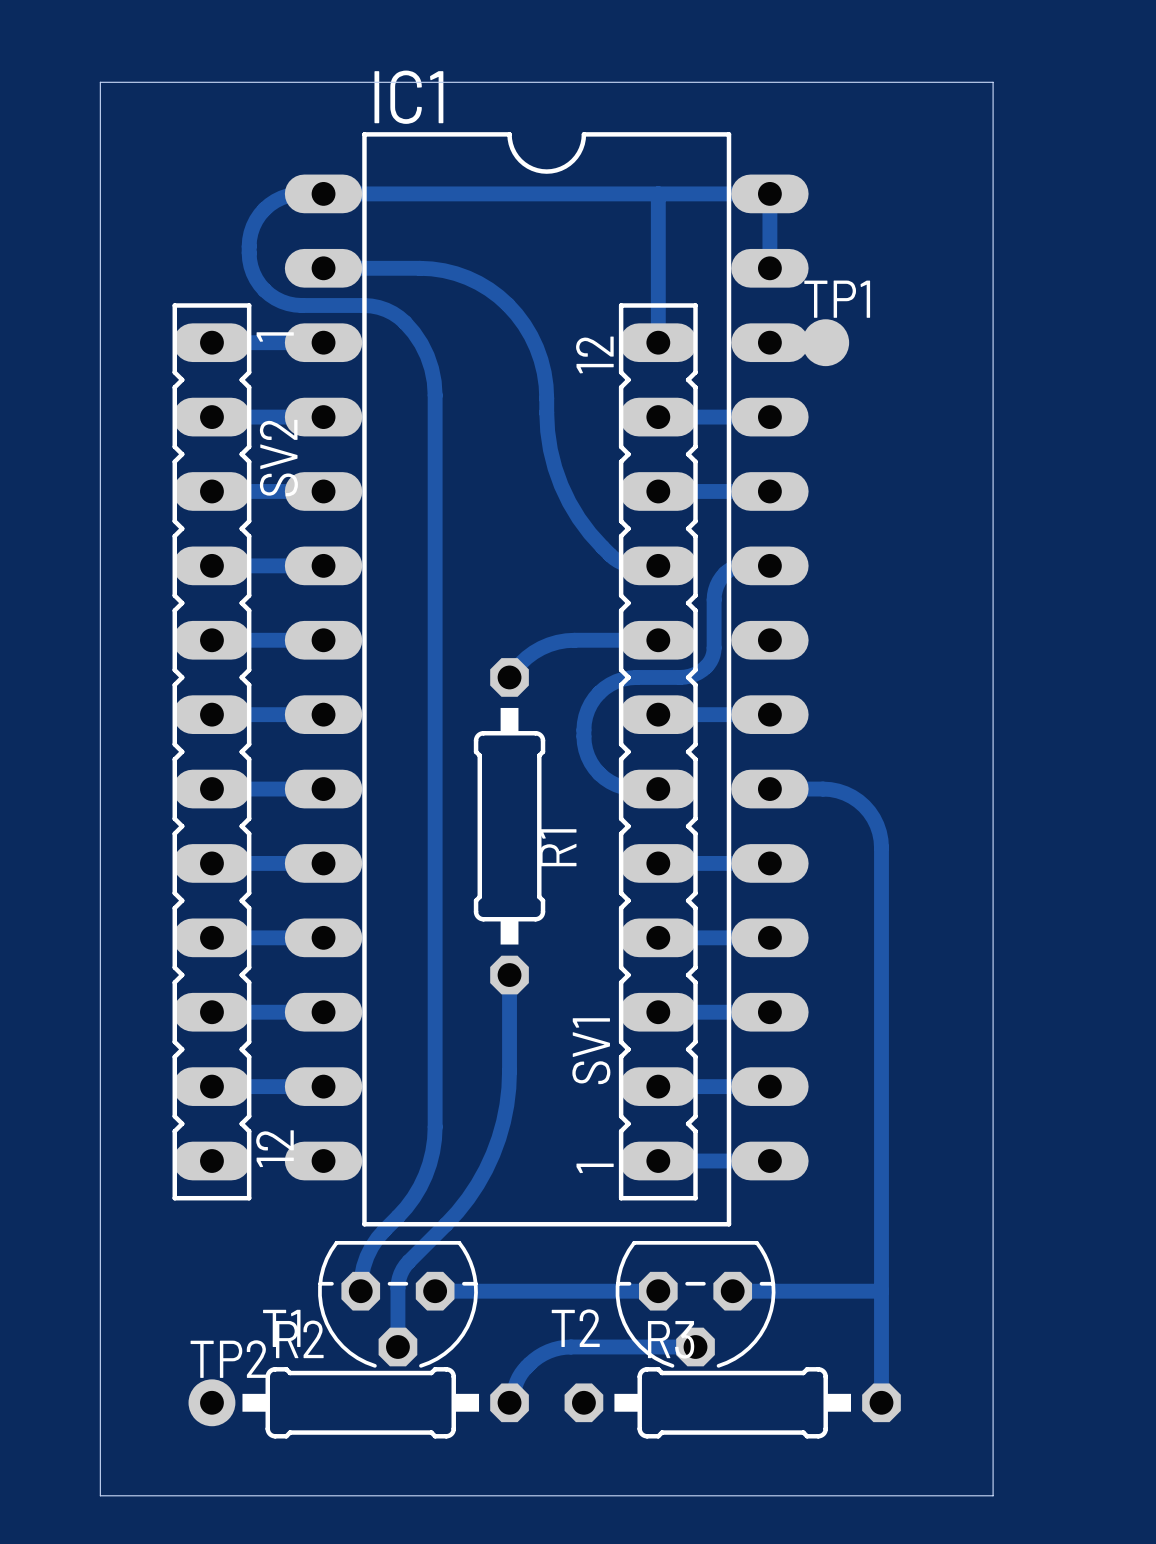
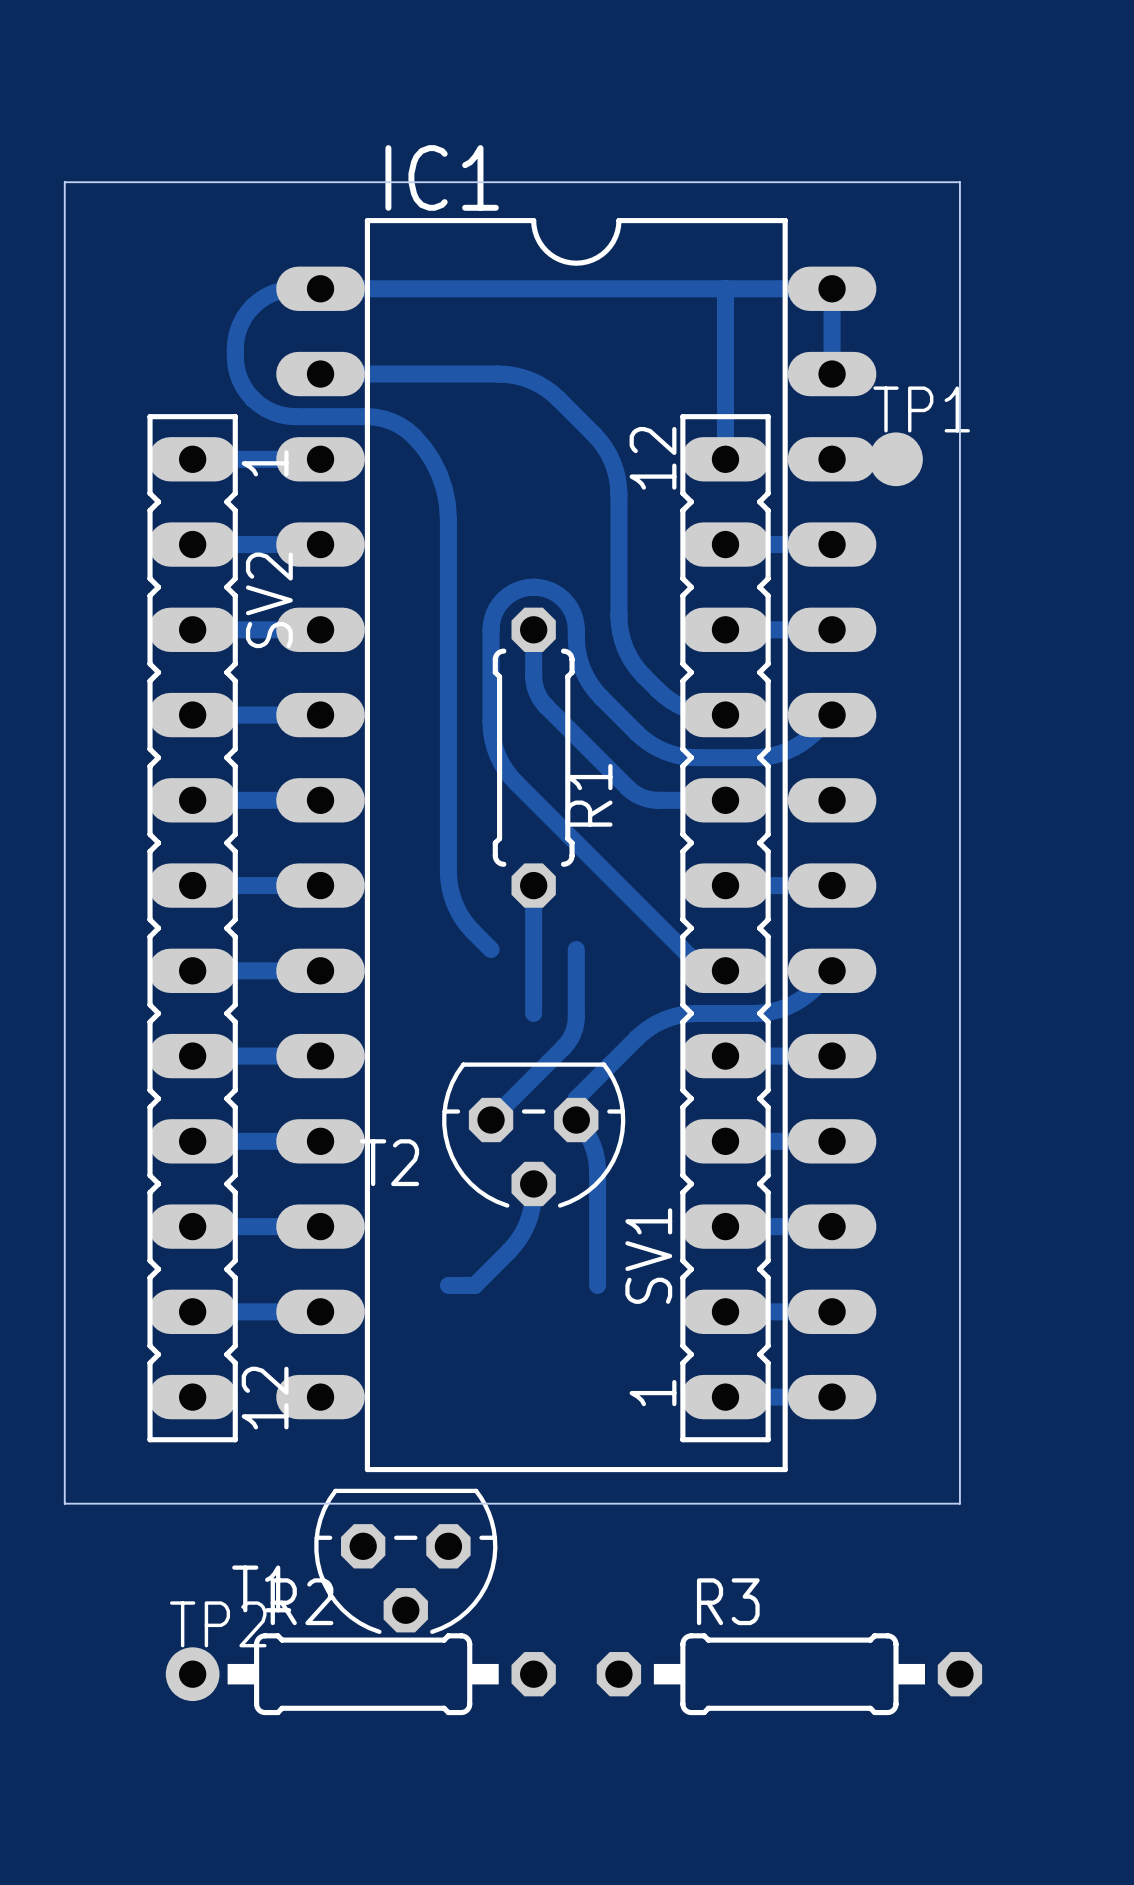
board edge: (100, 100) (100, 82) (993, 82) (993, 1495) (100, 1495) (100, 1254) -> (64, 182) (959, 182) (959, 1503) (64, 1503)
track: (658, 193) (658, 342) -> (725, 288) (725, 459)
track: (419, 268) (455, 273) (478, 283) (498, 296) (516, 314) (531, 336) (541, 360) (546, 385) (547, 431) (550, 449) (561, 485) (569, 502) (589, 533) (613, 558) (631, 565) (658, 565) -> (430, 374) (506, 374) (530, 380) (552, 393) (599, 440) (612, 461) (618, 486) (618, 615) (620, 632) (625, 648) (638, 669) (670, 700) (693, 711) (725, 715)
track: (769, 565) (736, 566) (727, 571) (719, 581) (714, 595) (713, 651) (710, 661) (702, 669) (684, 677) (622, 679) (604, 688) (590, 703) (585, 716) (583, 736) (585, 750) (594, 768) (610, 782) (622, 787) (658, 789) -> (832, 715) (801, 743) (786, 751) (770, 756) (696, 757) (672, 754) (656, 747) (642, 738) (590, 684) (582, 669) (577, 653) (575, 624) (573, 613) (559, 595) (544, 588) (522, 588) (507, 595) (494, 613) (491, 629) (491, 730) (494, 747) (505, 769) (516, 782) (689, 955) (705, 966) (725, 970)
track: (617, 640) (566, 640) (549, 644) (526, 657) (509, 677) -> (657, 800) (646, 798) (631, 791) (542, 702) (534, 681) (533, 629)
R1 footprint: [473, 658, 546, 995] -> [492, 607, 575, 908]
track: (435, 702) (434, 1139) (429, 1163) (420, 1186) (406, 1207) (377, 1238) (366, 1256) (361, 1277) (360, 1291) -> (448, 871) (452, 896) (458, 911) (467, 925) (491, 949)
track: none -> (533, 885) (533, 1013)
SV1 position: (658, 751) -> (725, 928)
track: none -> (576, 949) (576, 1017) (570, 1038) (491, 1120)
track: (769, 789) (822, 789) (845, 793) (858, 801) (869, 811) (877, 825) (880, 839) (881, 1402) -> (832, 970) (801, 999) (778, 1009) (754, 1013) (688, 1013) (672, 1017) (656, 1023) (636, 1038) (576, 1098) (576, 1120) (592, 1143) (596, 1161) (597, 1285)
track: (509, 981) (508, 1088) (498, 1138) (485, 1169) (468, 1198) (446, 1224) (408, 1261) (400, 1273) (397, 1288) (397, 1346) -> (533, 1191) (530, 1216) (523, 1231) (514, 1245) (474, 1285) (448, 1285)
track: (435, 1291) (658, 1291) -> none
track: (732, 1291) (881, 1291) -> none
T2 position: (695, 1304) -> (533, 1135)
track: (695, 1346) (570, 1346) (553, 1349) (538, 1356) (523, 1370) (516, 1381) (513, 1398) (509, 1402) -> none

